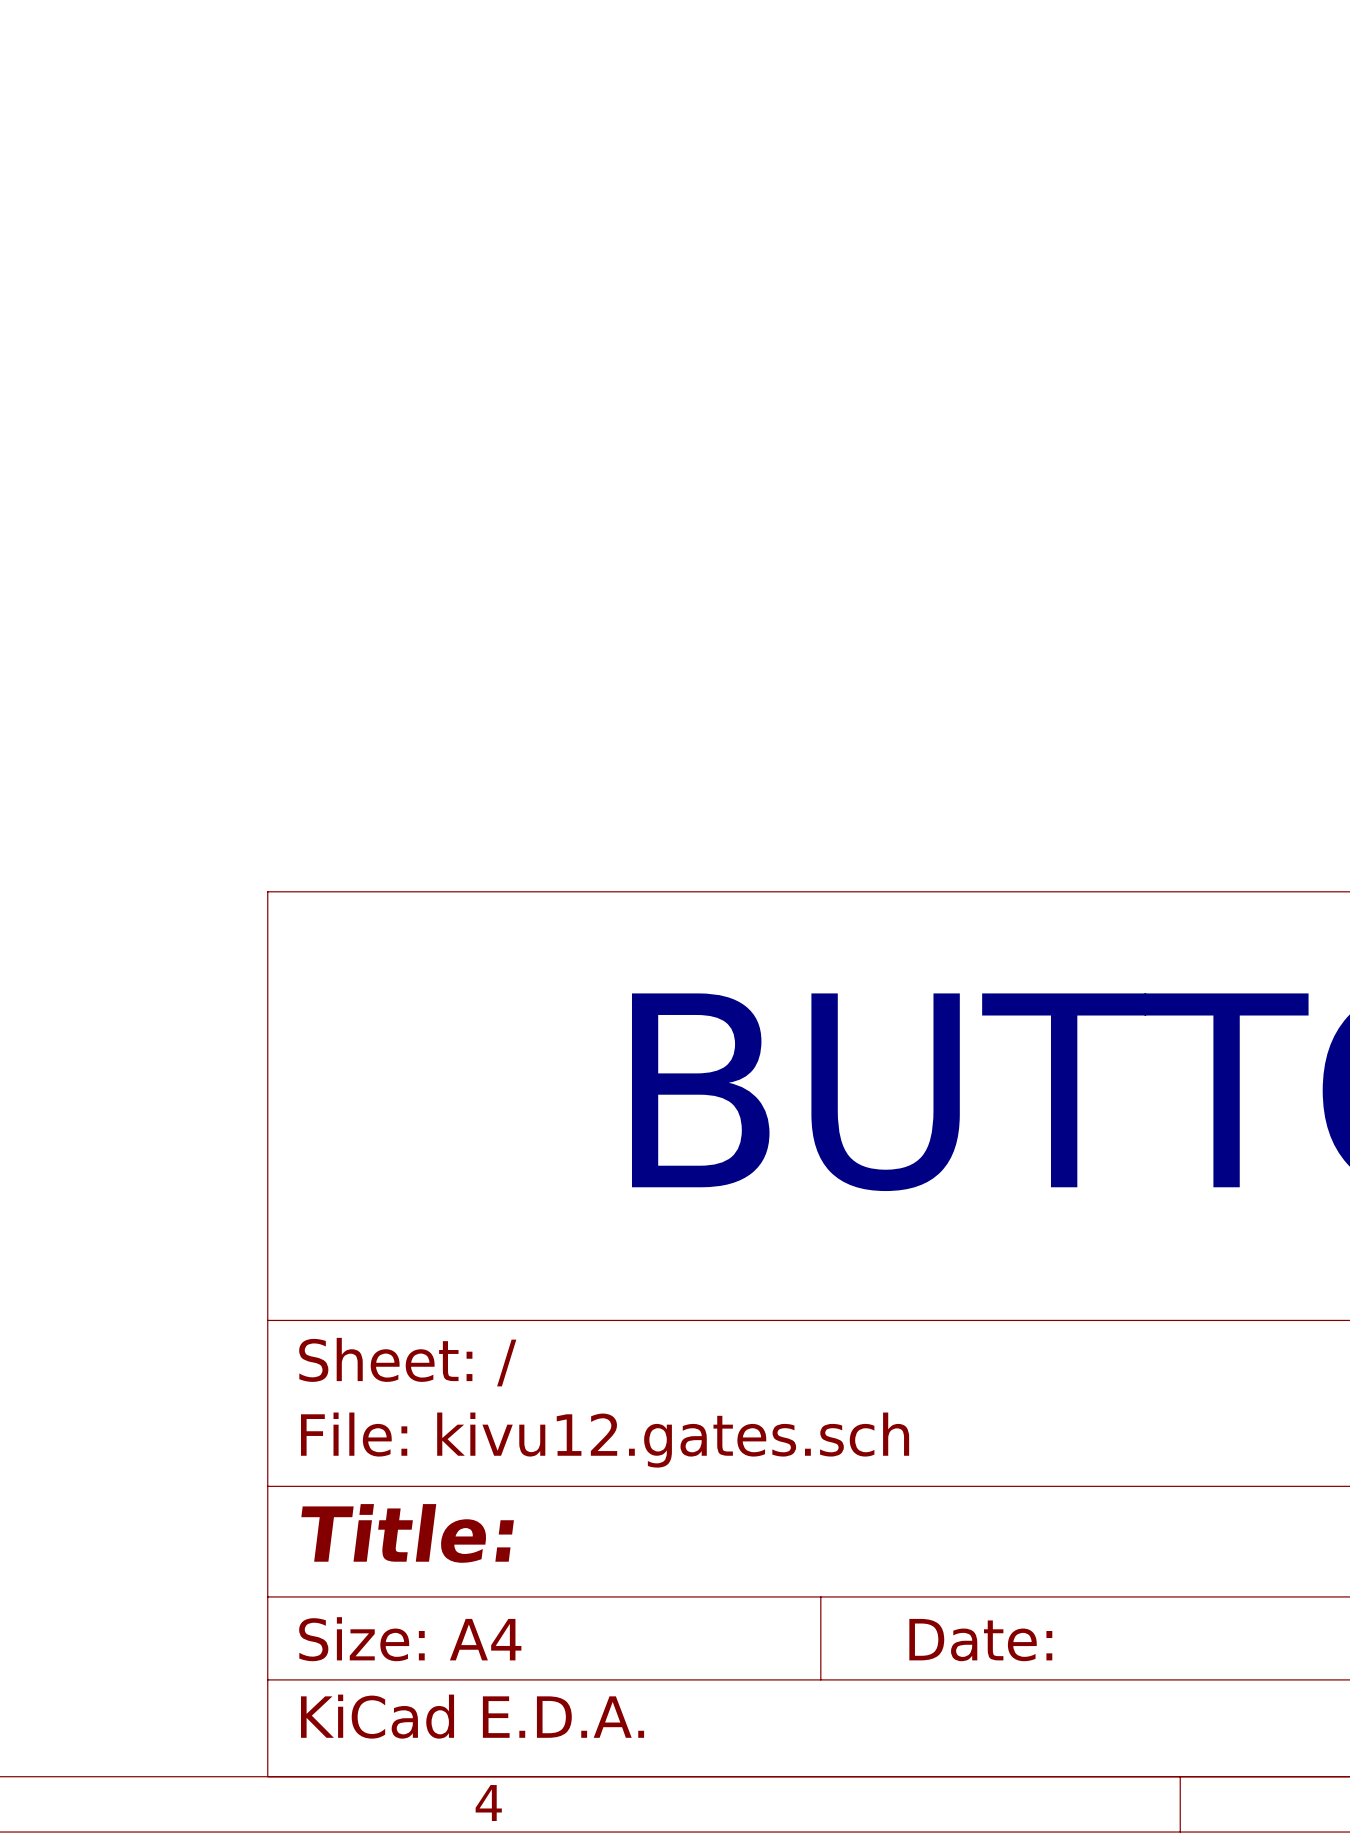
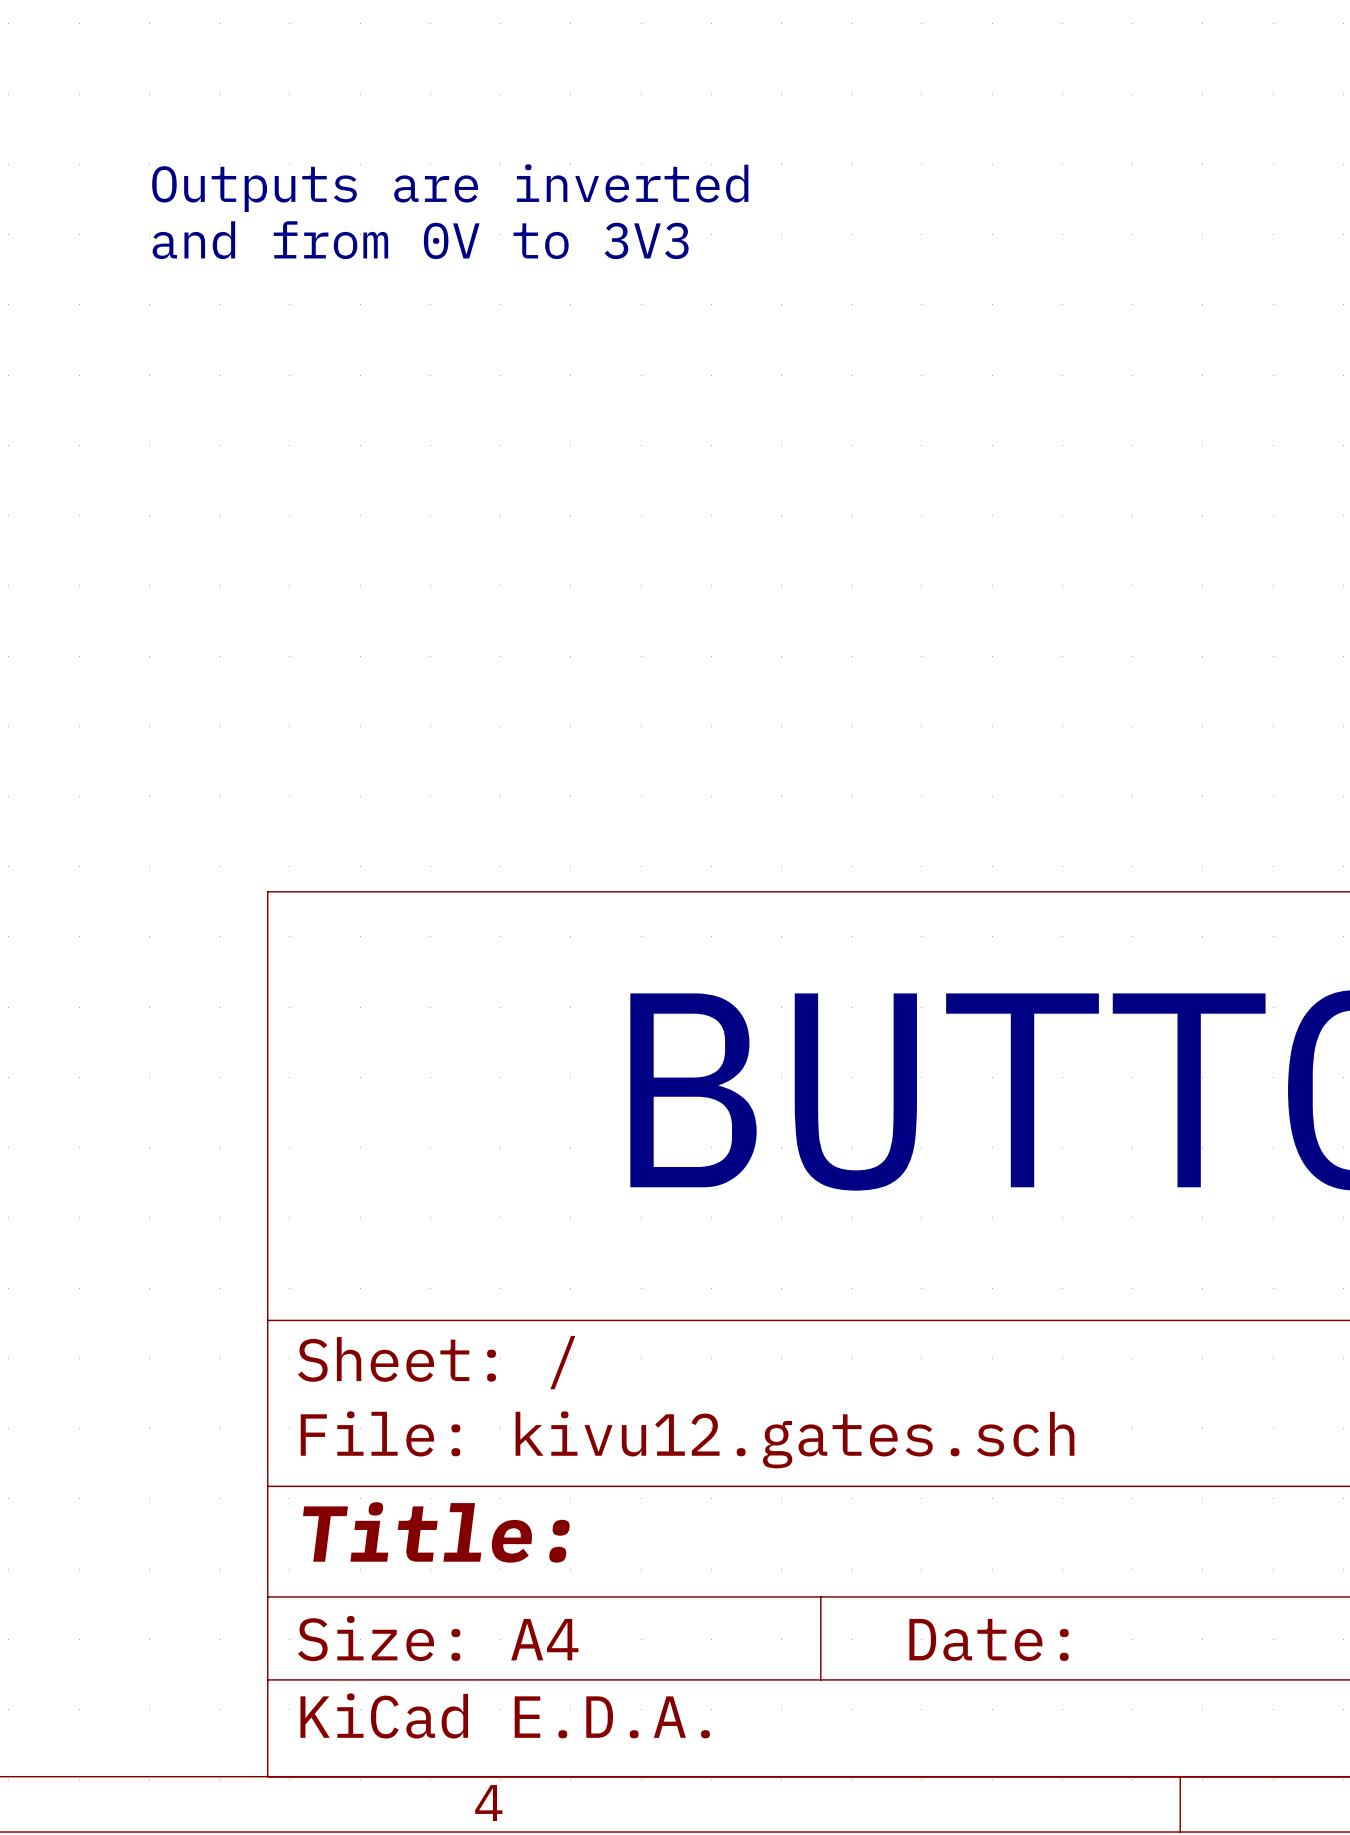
text: none -> Outputs are inverted (450, 188)
text: none -> and from 0V to 3V3 (420, 240)

